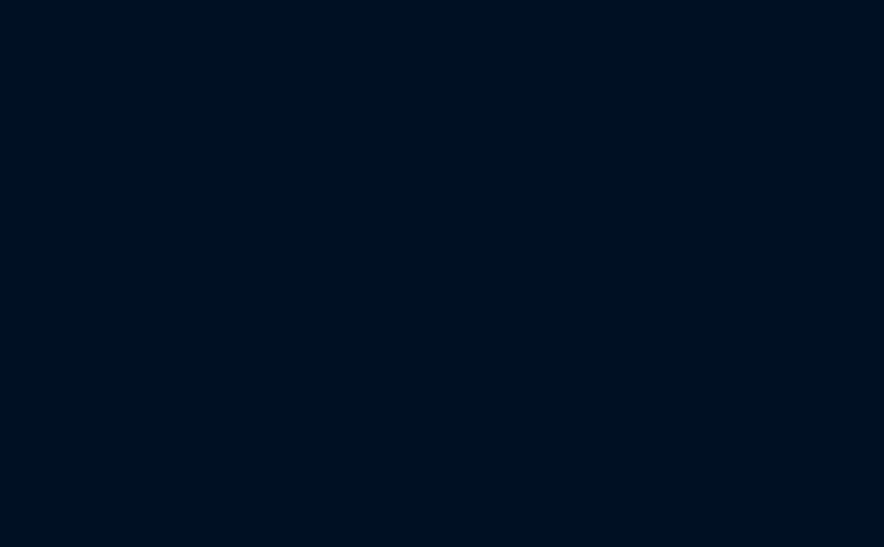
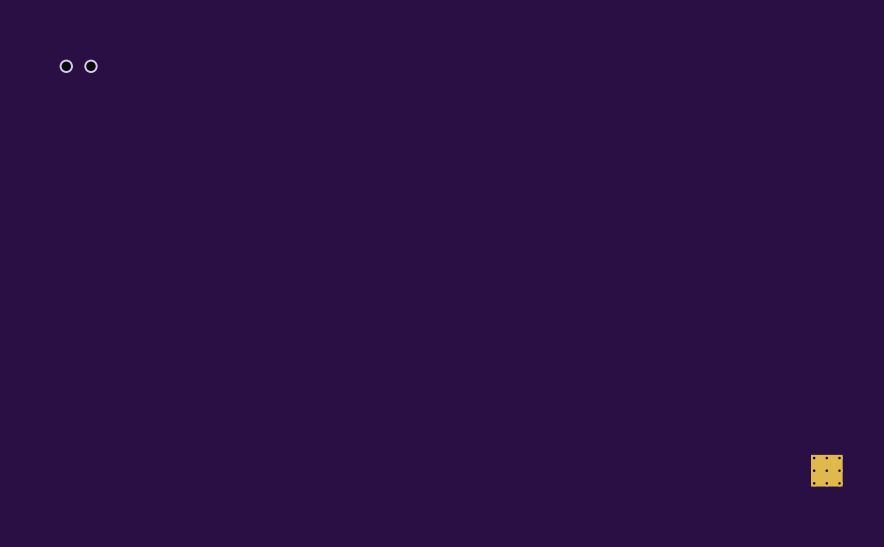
part: none -> (78, 66)
part: none -> (826, 470)

